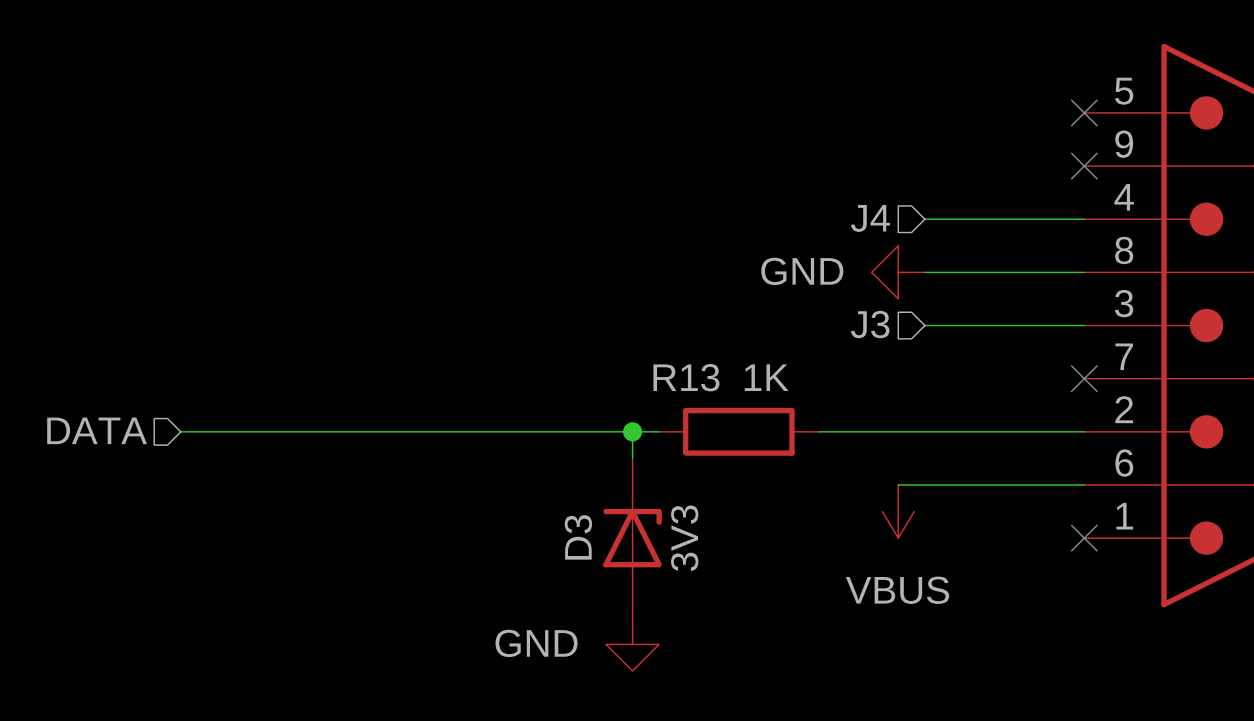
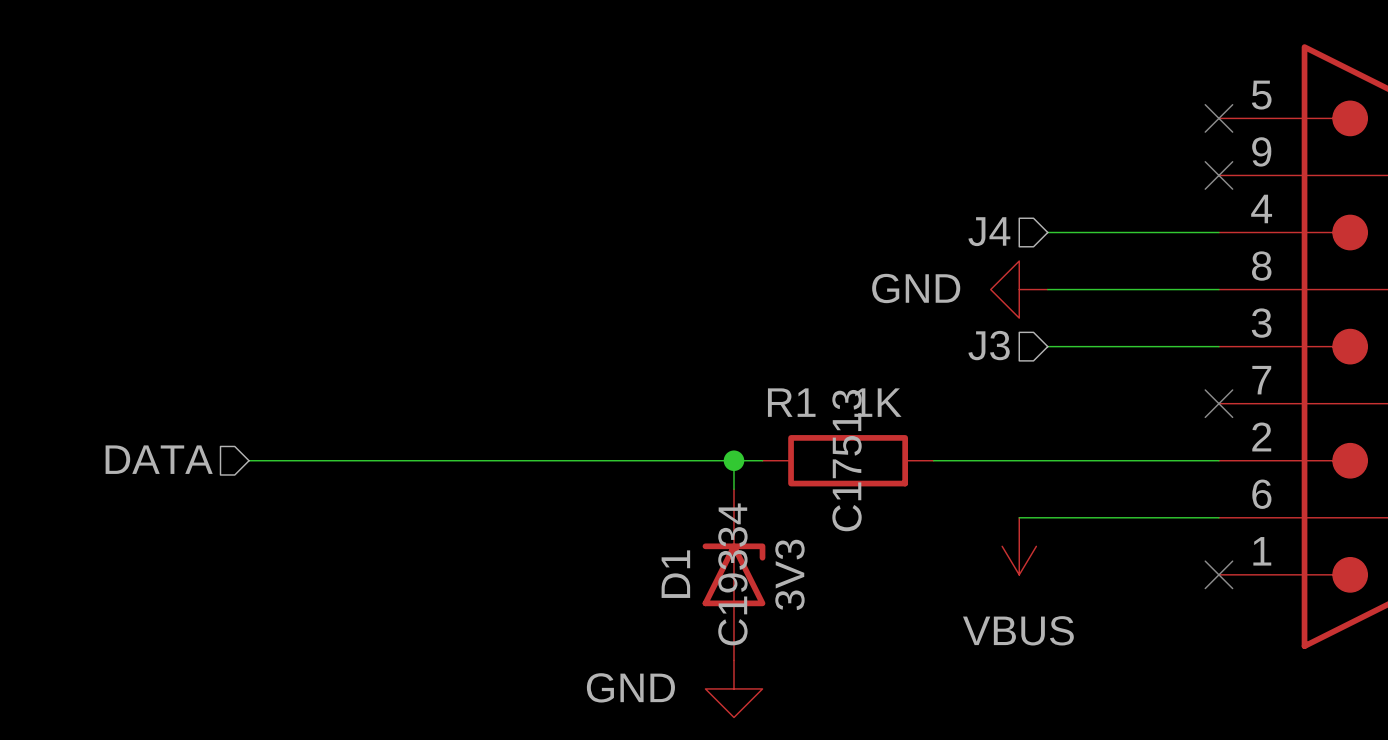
R13 name: R13 (686, 377) -> R1 (791, 402)
R13 text: none -> C17513 (847, 460)
D3 name: D3 (578, 537) -> D1 (675, 574)
D3 text: none -> C19334 (732, 574)

